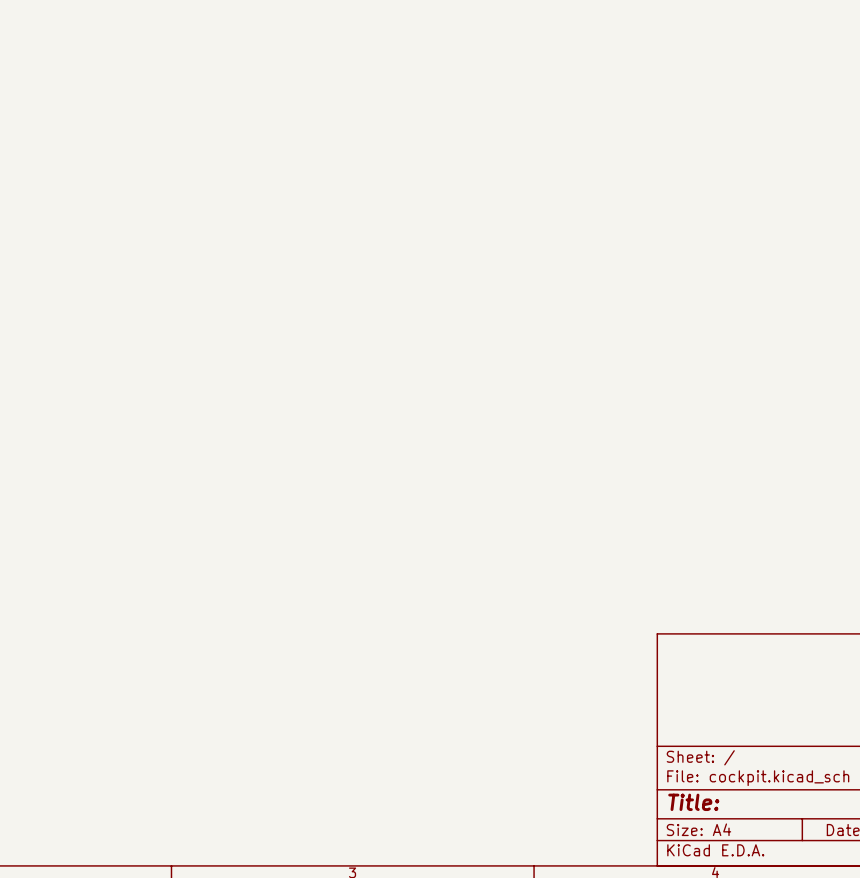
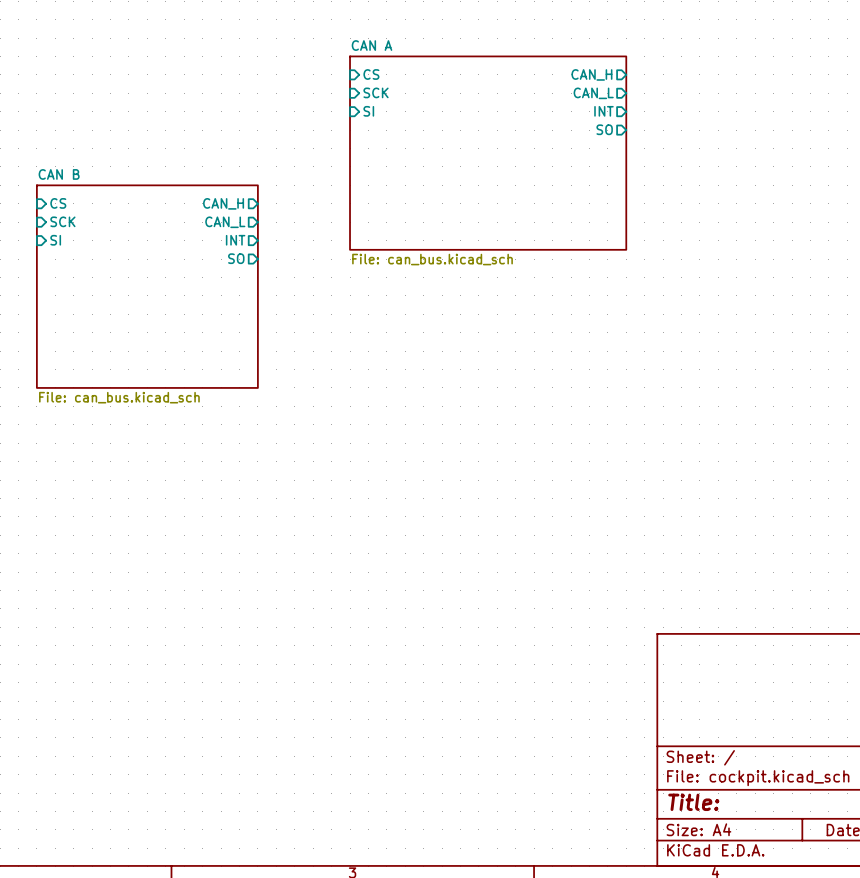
sheet pin: none -> CS (371, 74)
sheet pin: none -> CAN_H (591, 74)
sheet pin: none -> SCK (376, 92)
sheet pin: none -> CAN_L (593, 93)
sheet pin: none -> SI (368, 111)
sheet pin: none -> INT (603, 111)
sheet pin: none -> SO (604, 129)
sheet CAN A: none -> File: can_bus.kicad_sch (488, 153)
sheet pin: none -> CS (58, 203)
sheet pin: none -> CAN_H (223, 203)
sheet pin: none -> SCK (62, 221)
sheet pin: none -> CAN_L (225, 222)
sheet pin: none -> SI (55, 240)
sheet pin: none -> INT (235, 240)
sheet pin: none -> SO (236, 258)
sheet CAN B: none -> File: can_bus.kicad_sch (147, 286)

